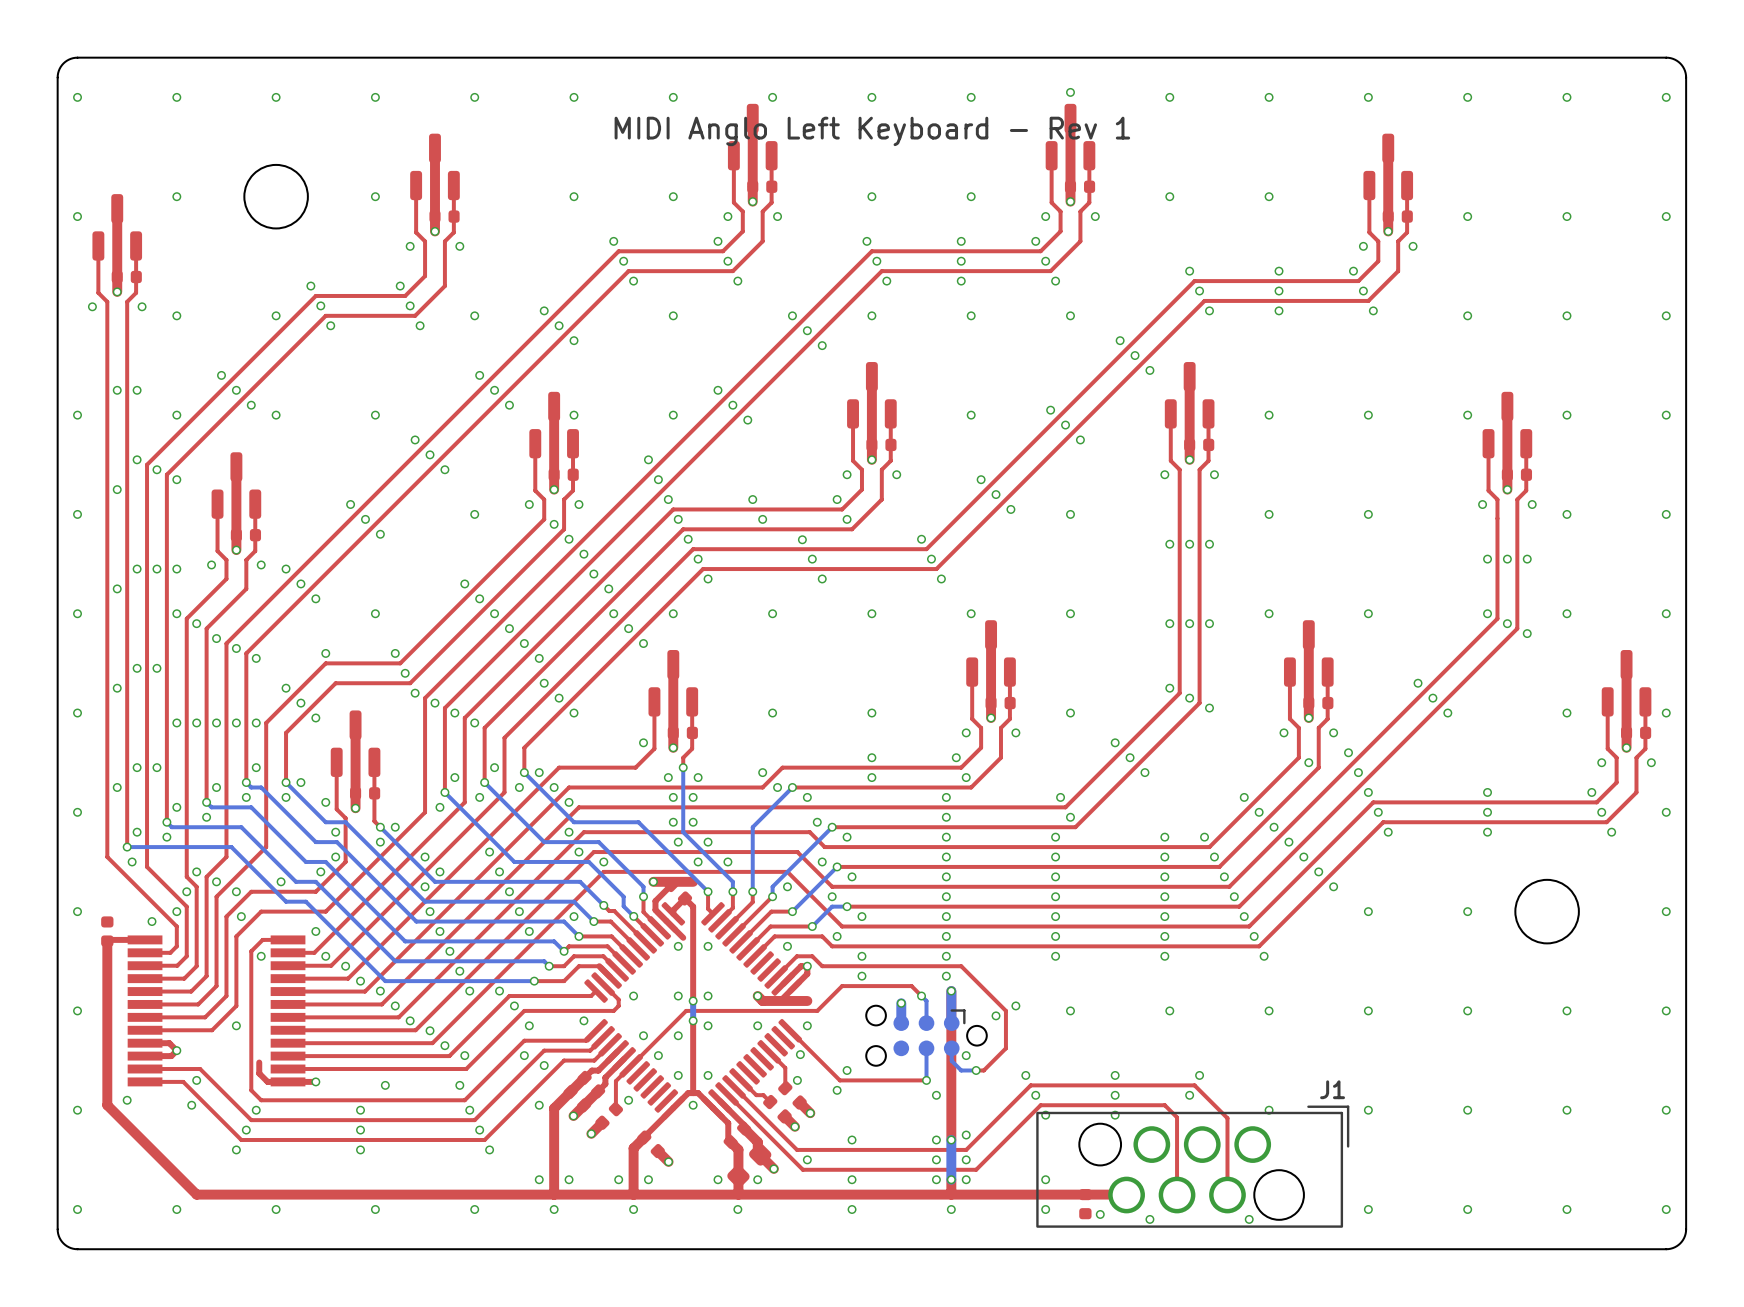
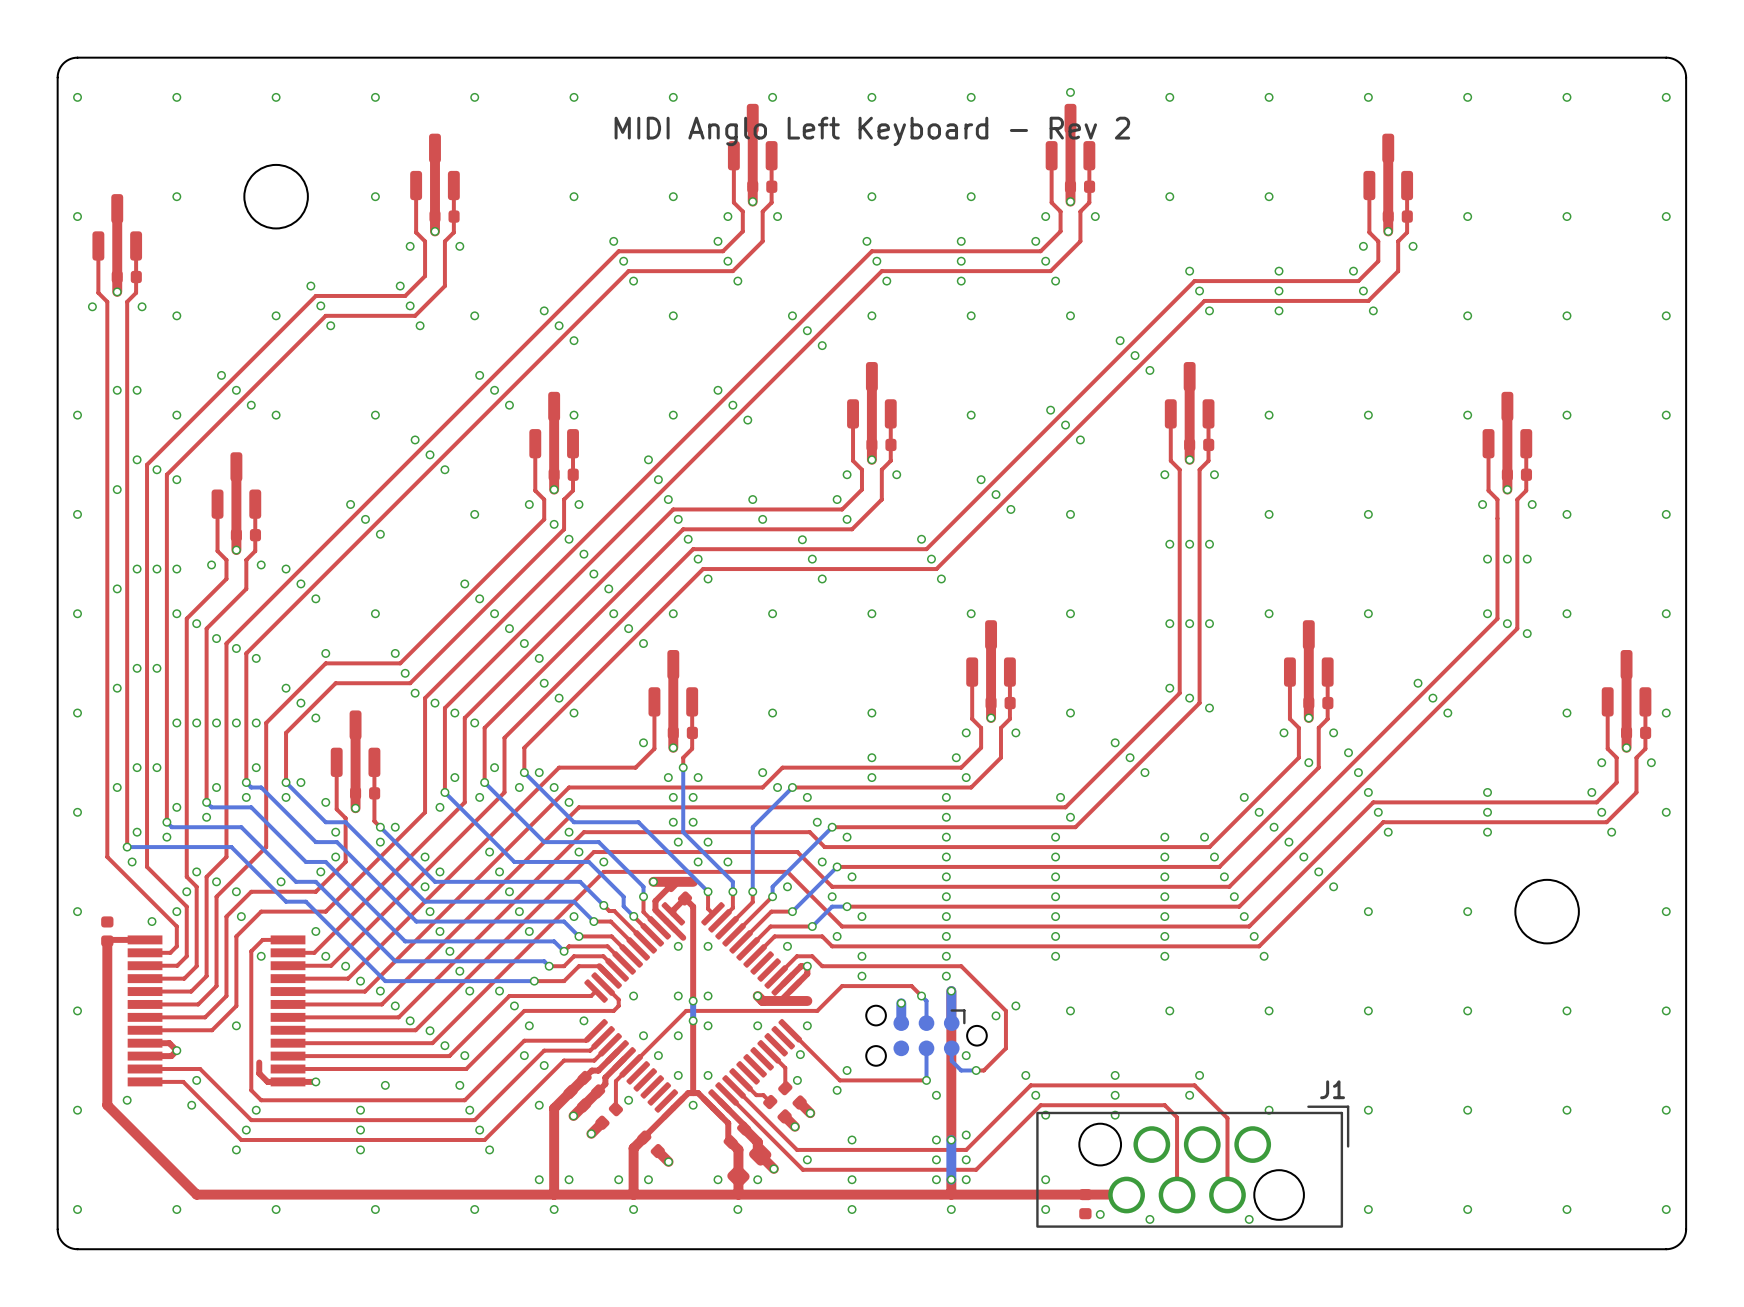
text: MIDI Anglo Left Keyboard - Rev 1 (872, 131) -> MIDI Anglo Left Keyboard - Rev 2 (872, 131)

